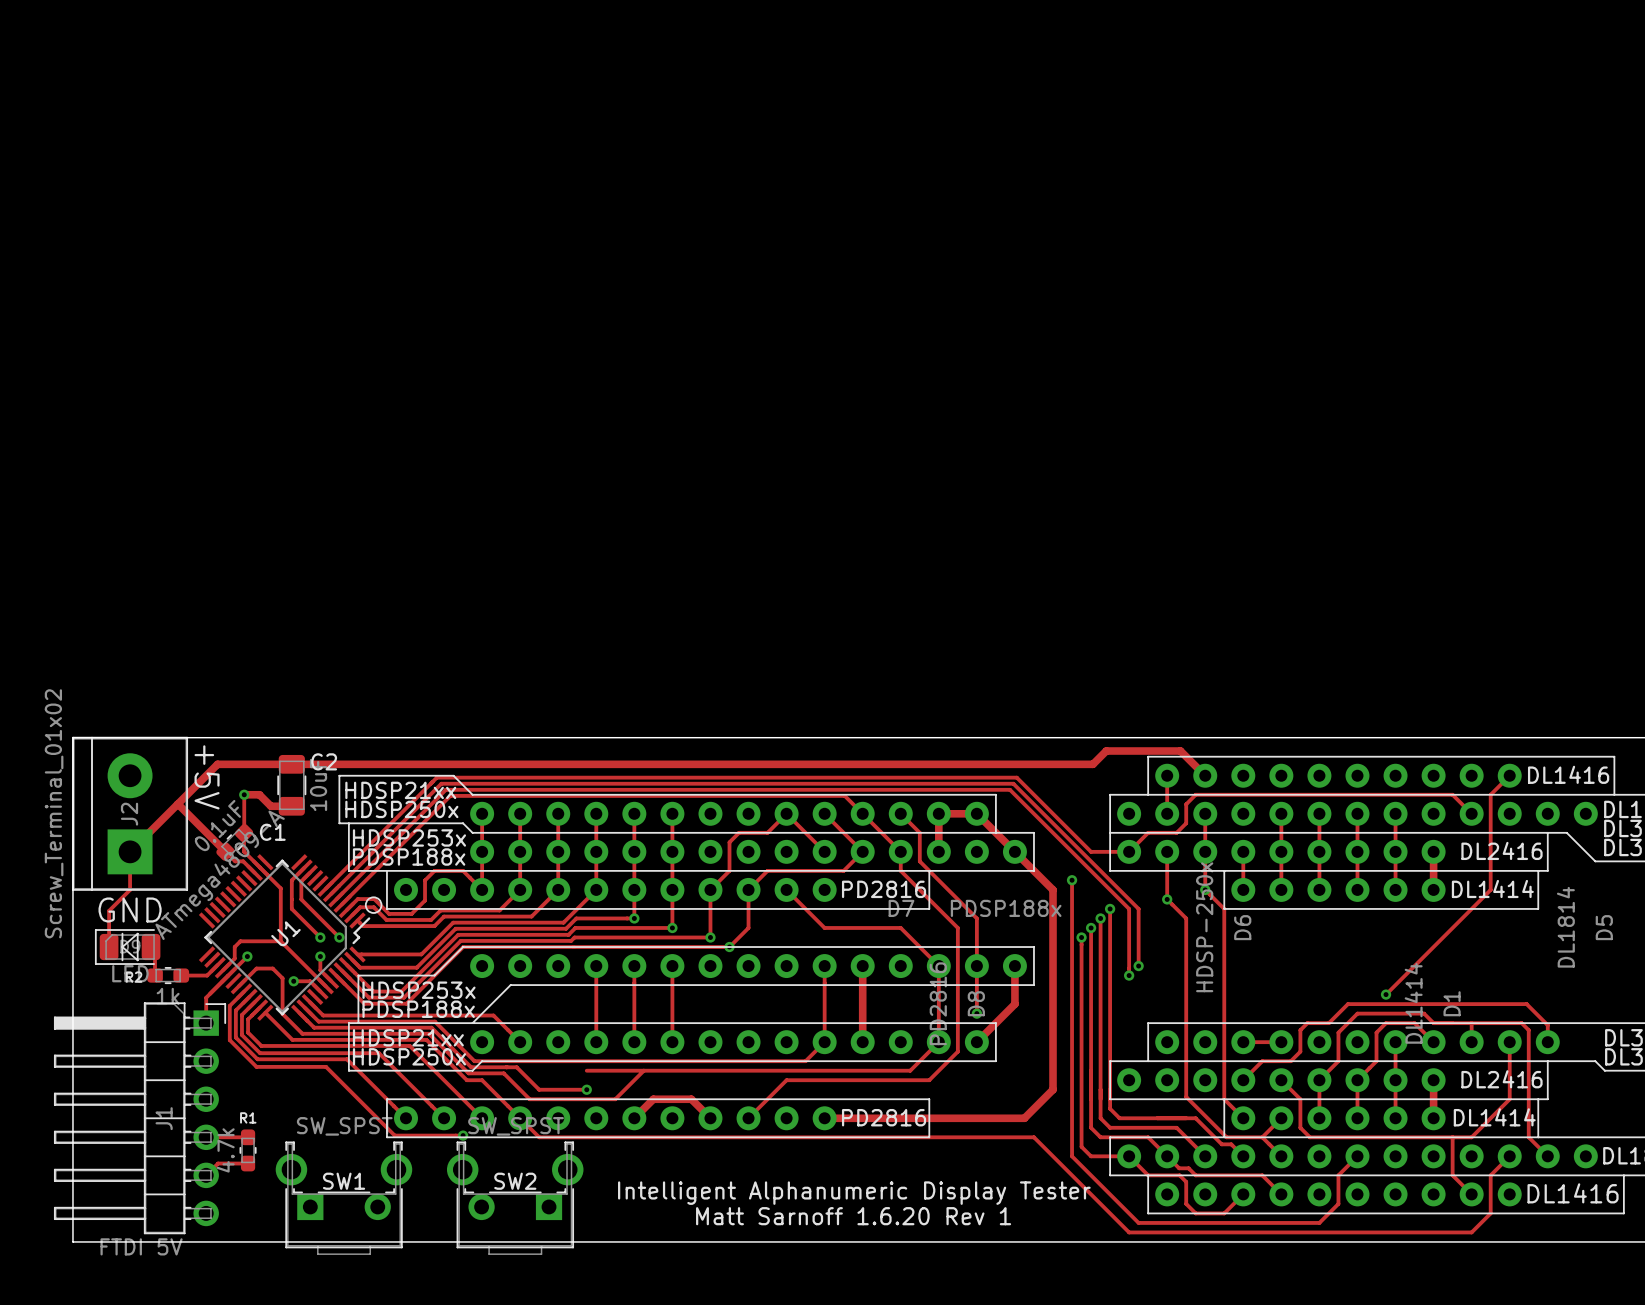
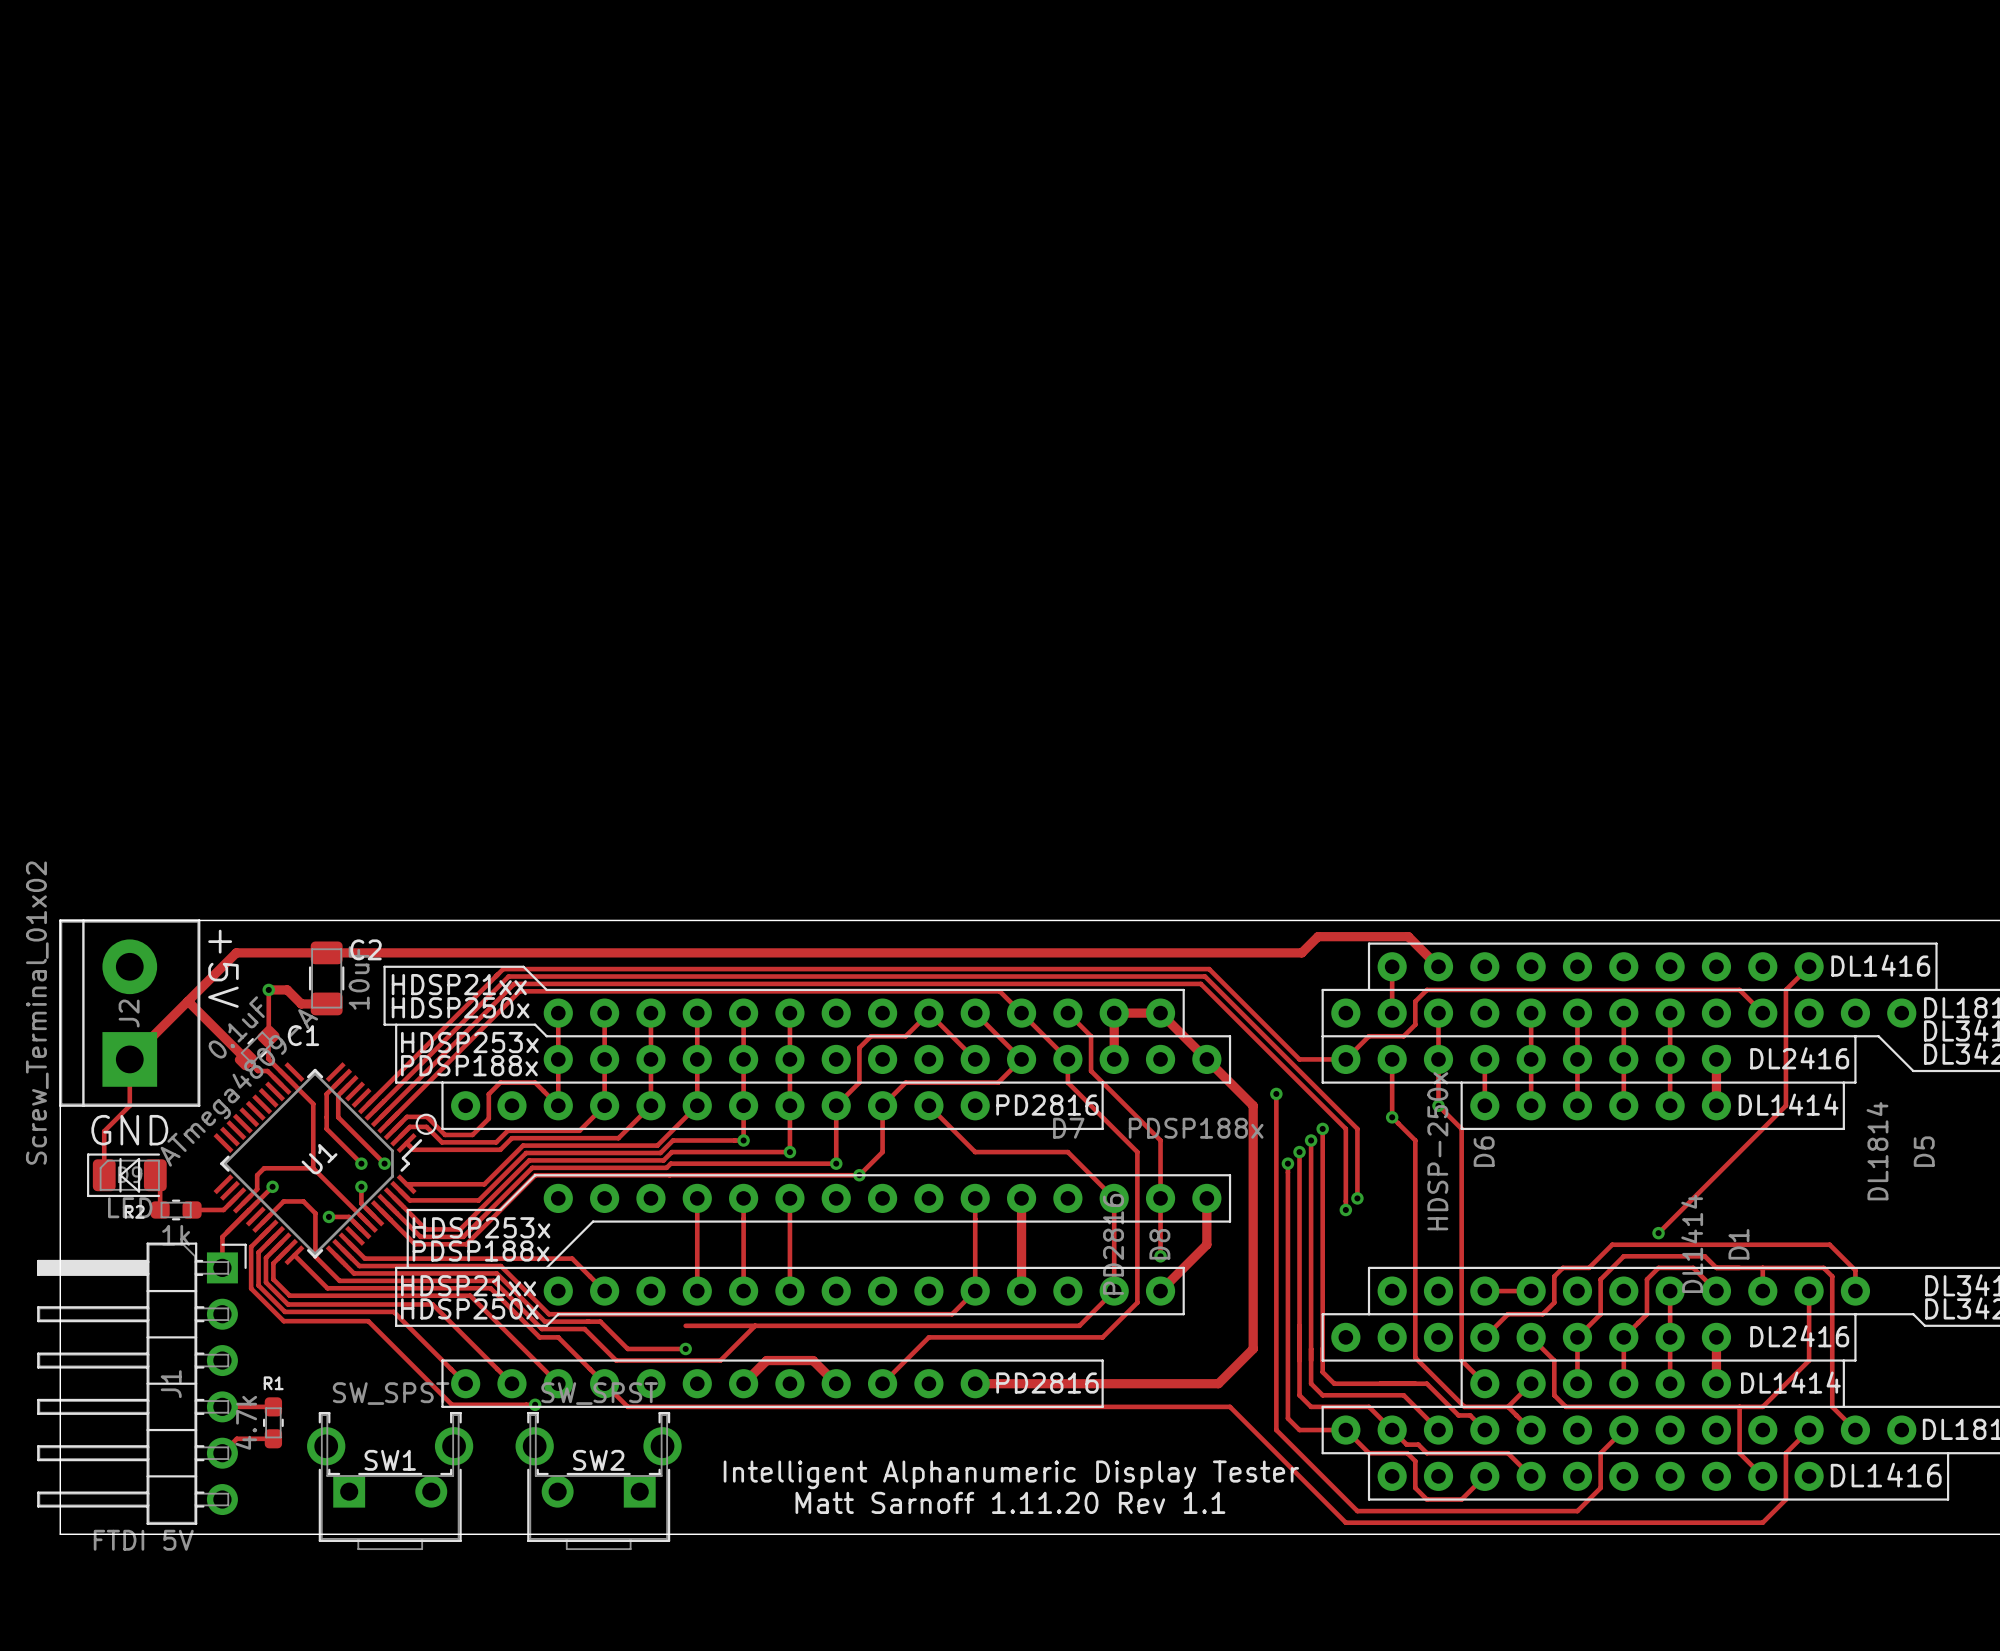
text: Matt Sarnoff 1.6.20 Rev 1 (853, 1216) -> Matt Sarnoff 1.11.20 Rev 1.1 (1010, 1502)

